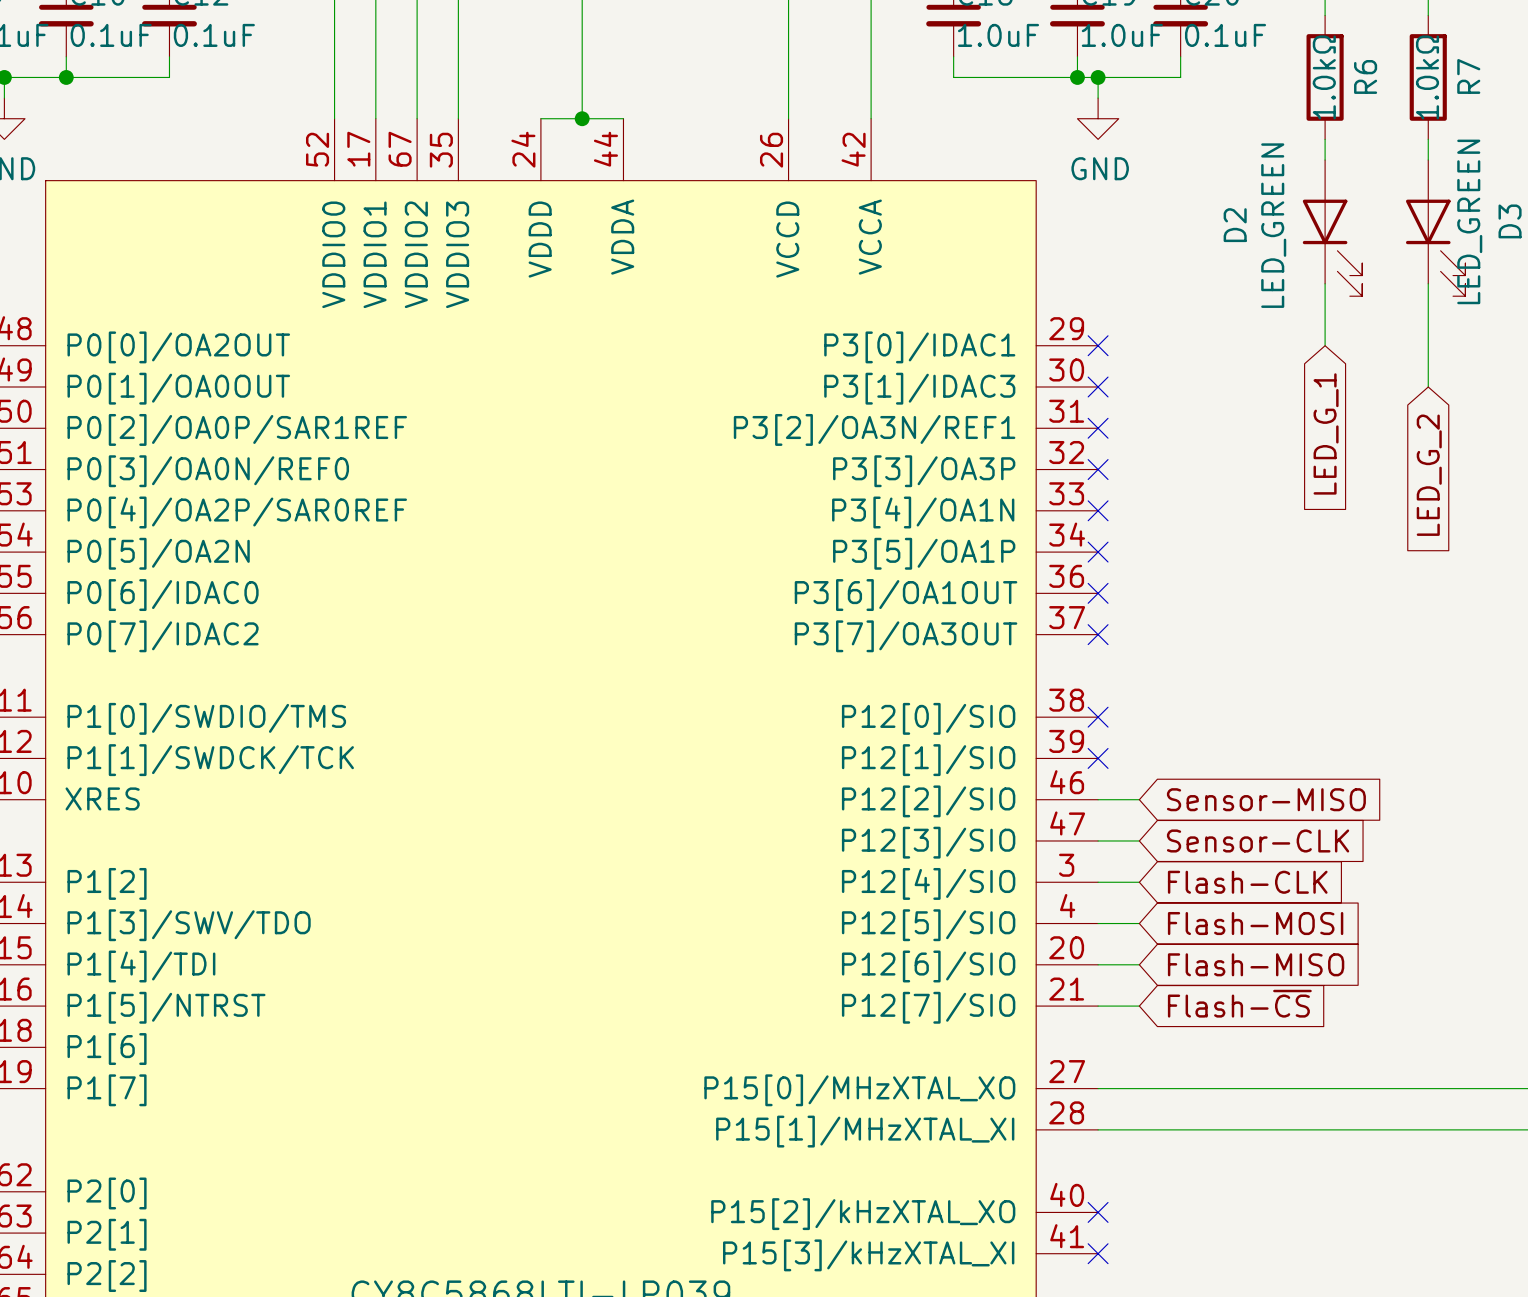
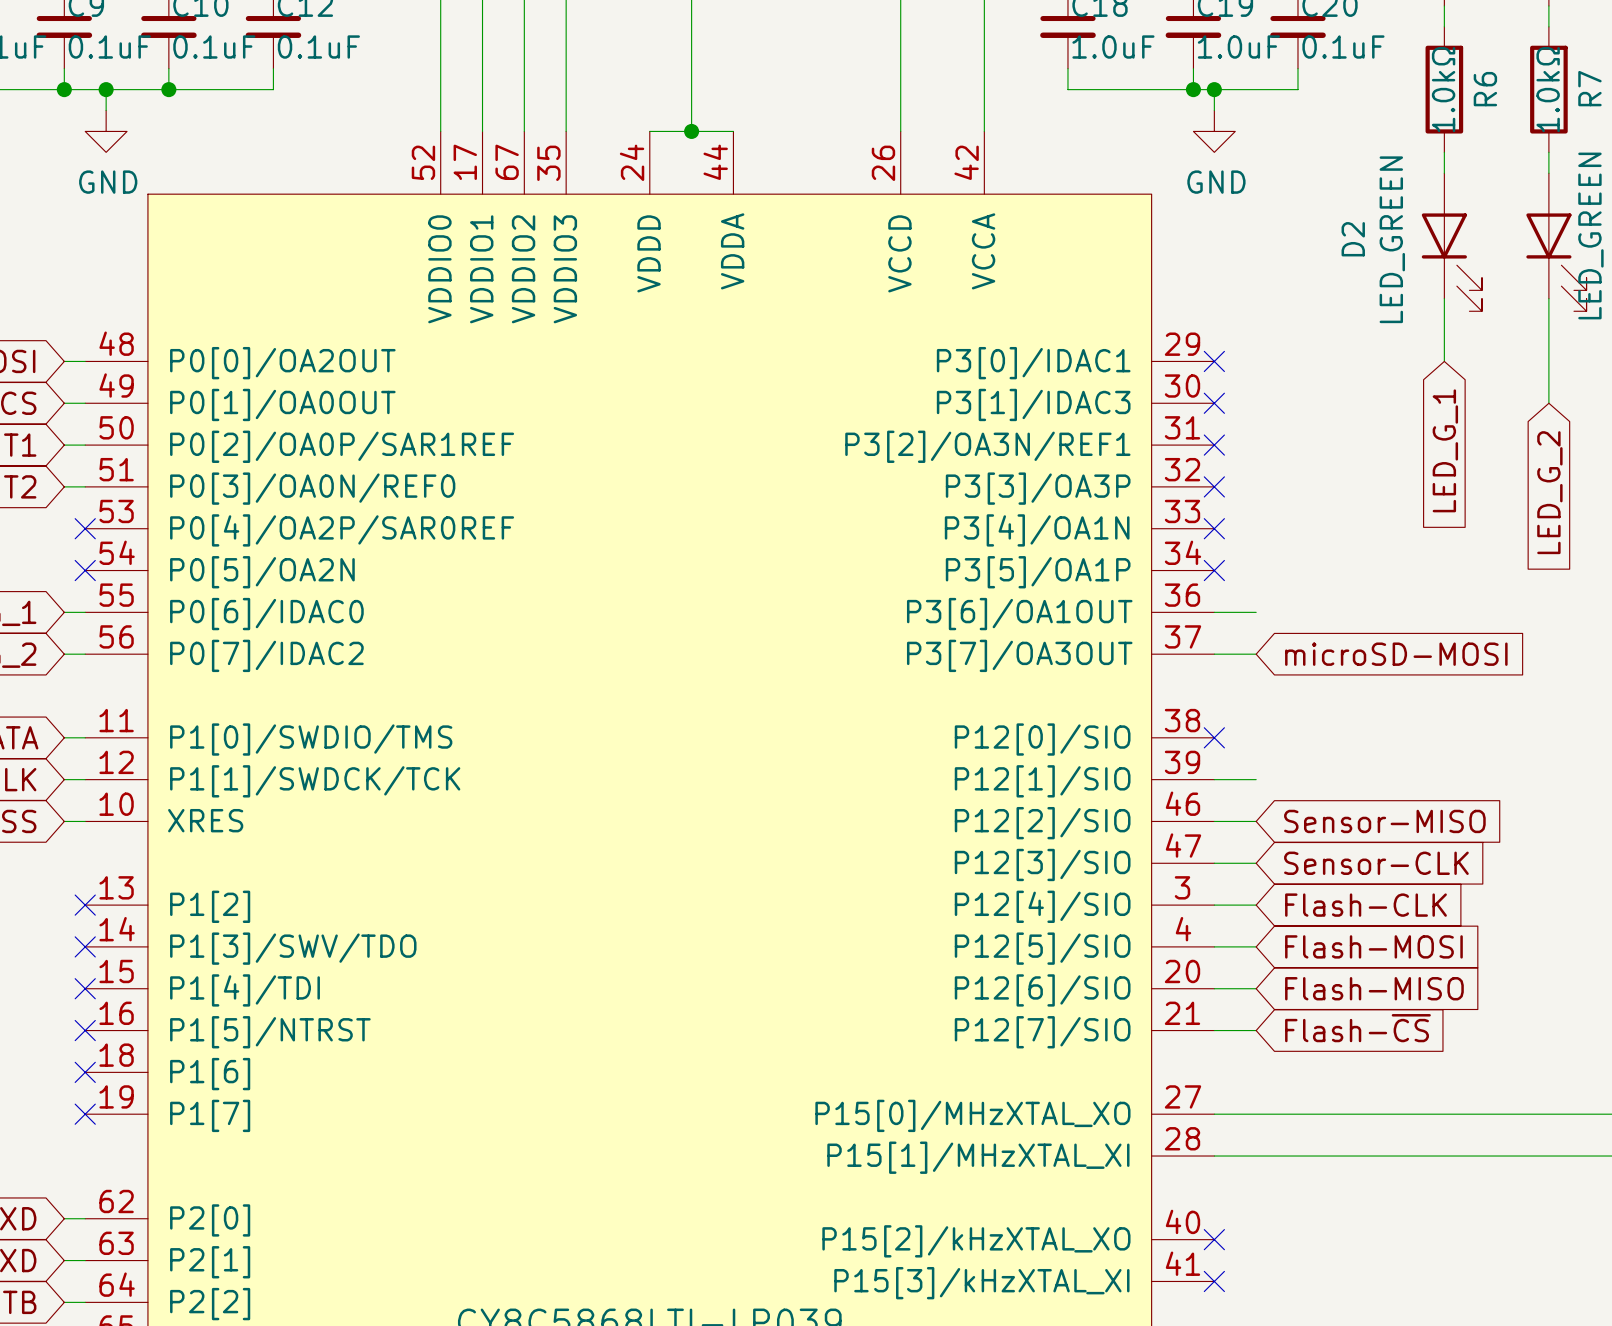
wire: none -> (1214, 612) (1256, 612)
no-connect mark: (1098, 593) -> none
wire: none -> (1214, 654) (1256, 654)
no-connect mark: (1098, 634) -> none
global label: none -> microSD-MOSI (1396, 654)
wire: none -> (1214, 779) (1256, 779)
no-connect mark: (1098, 758) -> none

